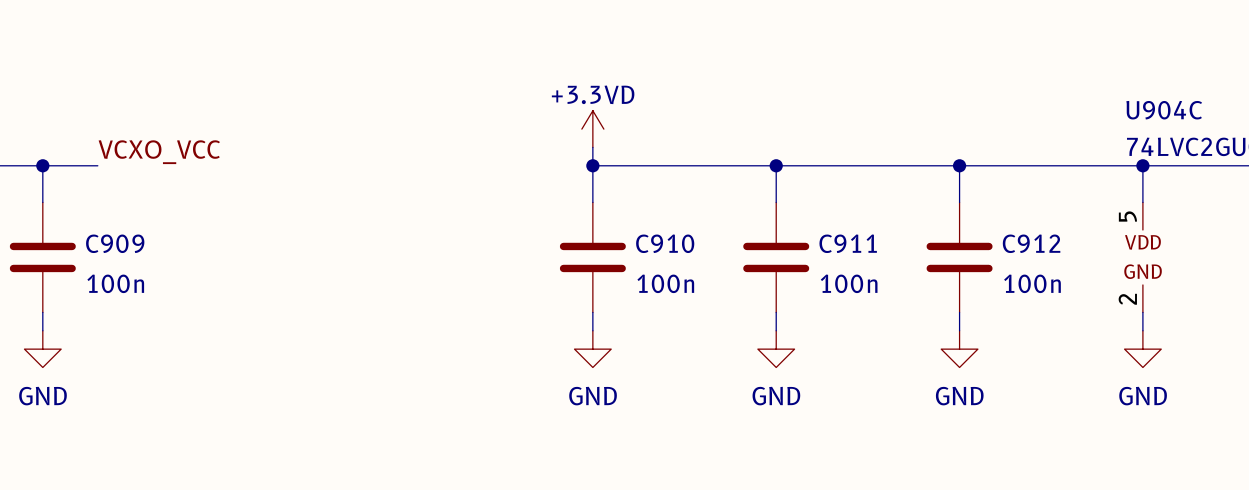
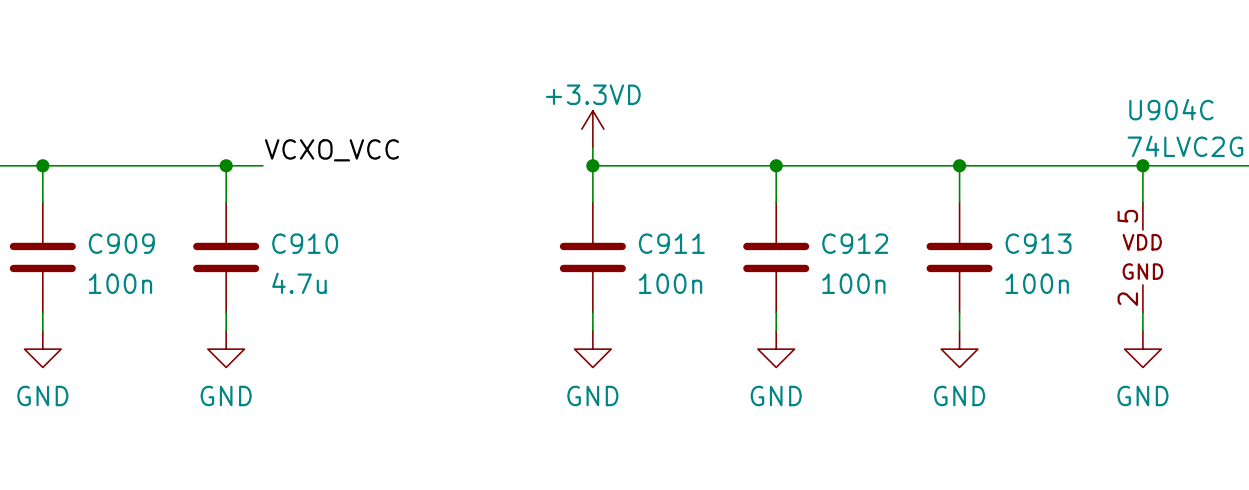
label position: VCXO_VCC (159, 152) -> VCXO_VCC (331, 150)
wire: none -> (97, 165) (262, 165)
wire: none -> (226, 165) (226, 202)
junction: none -> (226, 165)
C910 name: C910 (665, 243) -> C911 (671, 243)
C911 name: C911 (848, 243) -> C912 (855, 243)
C912 name: C912 (1031, 243) -> C913 (1038, 243)
C910: none -> 4.7u (226, 257)
wire: none -> (226, 312) (226, 330)
power symbol: none -> GND (226, 349)

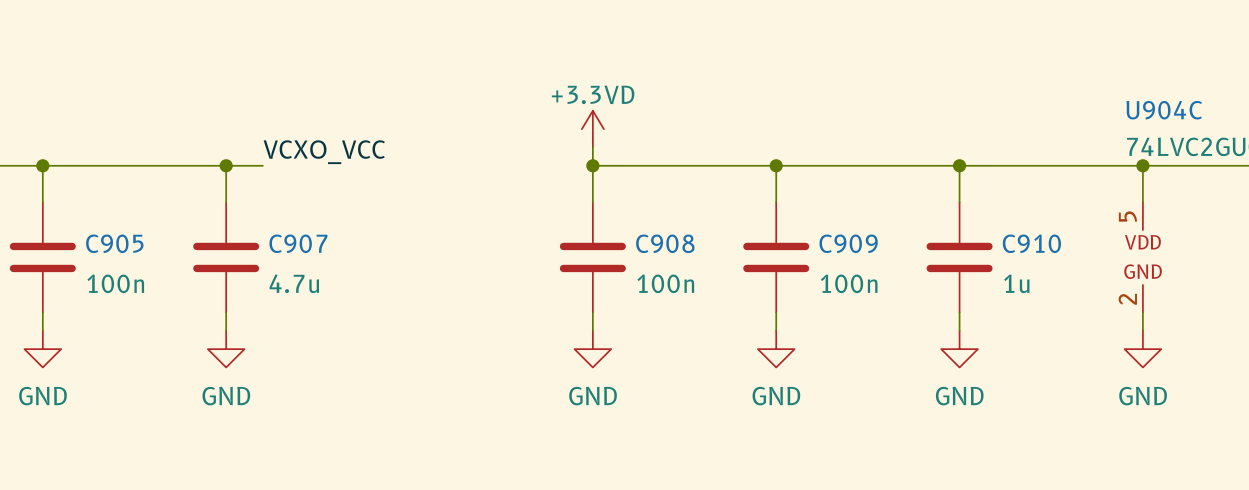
C909 name: C909 (121, 243) -> C905 (114, 243)
C910 name: C910 (305, 243) -> C907 (298, 243)
C911 name: C911 (671, 243) -> C908 (665, 243)
C912 name: C912 (855, 243) -> C909 (848, 243)
C913 name: C913 (1038, 243) -> C910 (1031, 243)
C913 value: 100n (1037, 283) -> 1u (1016, 283)

